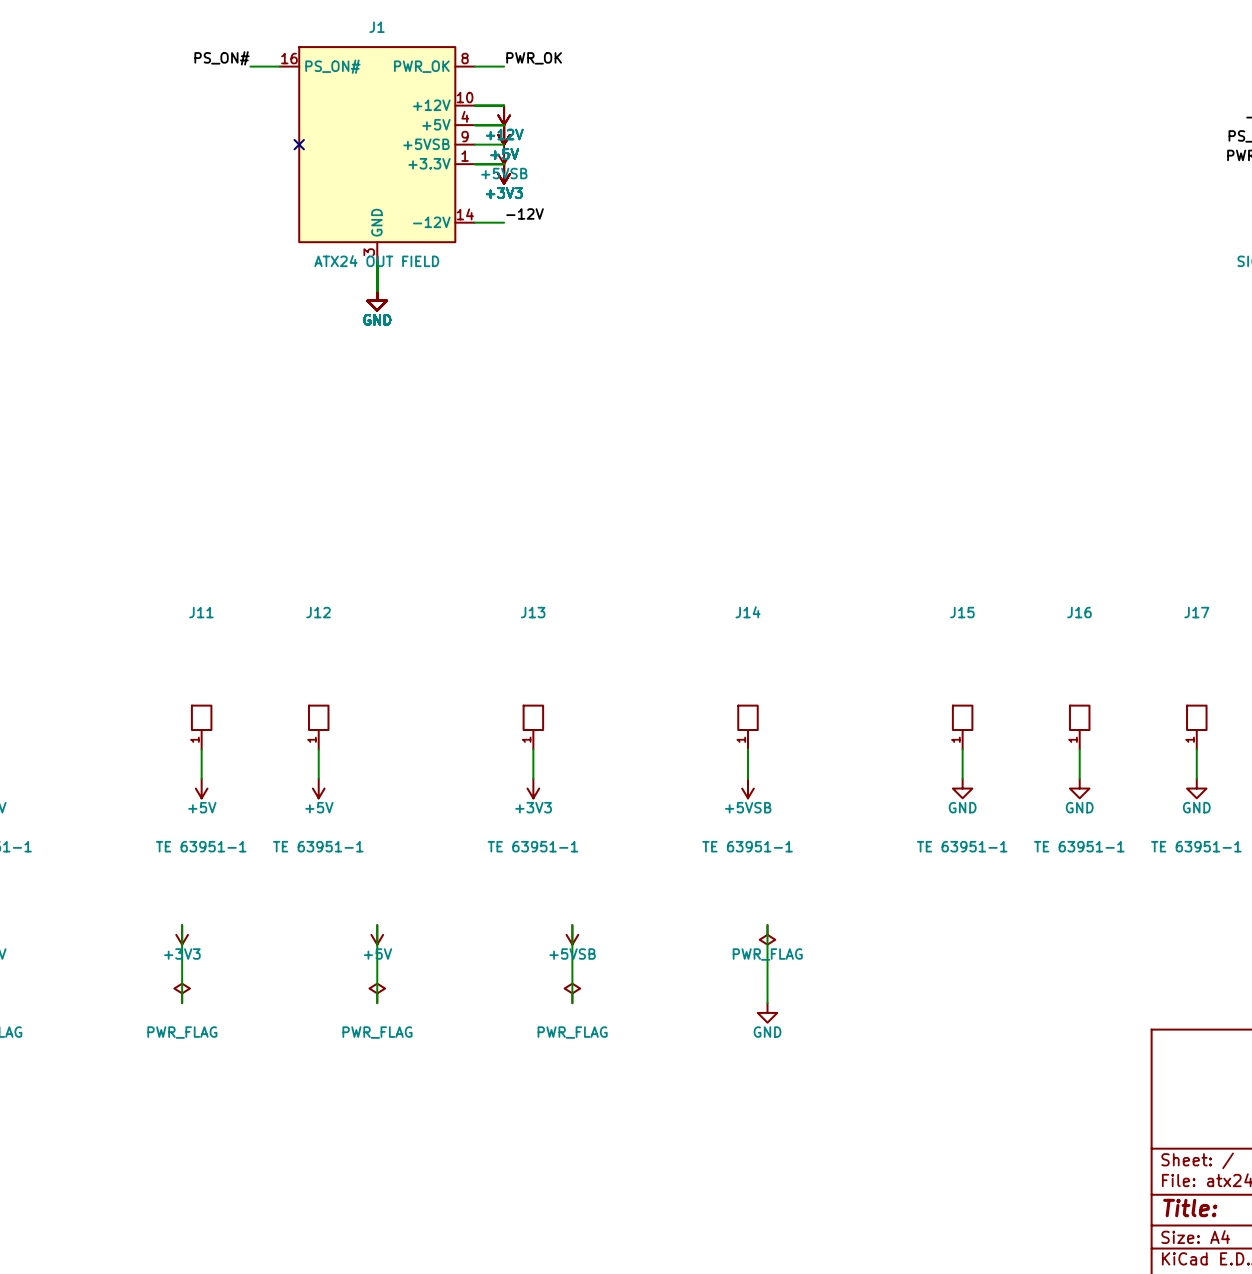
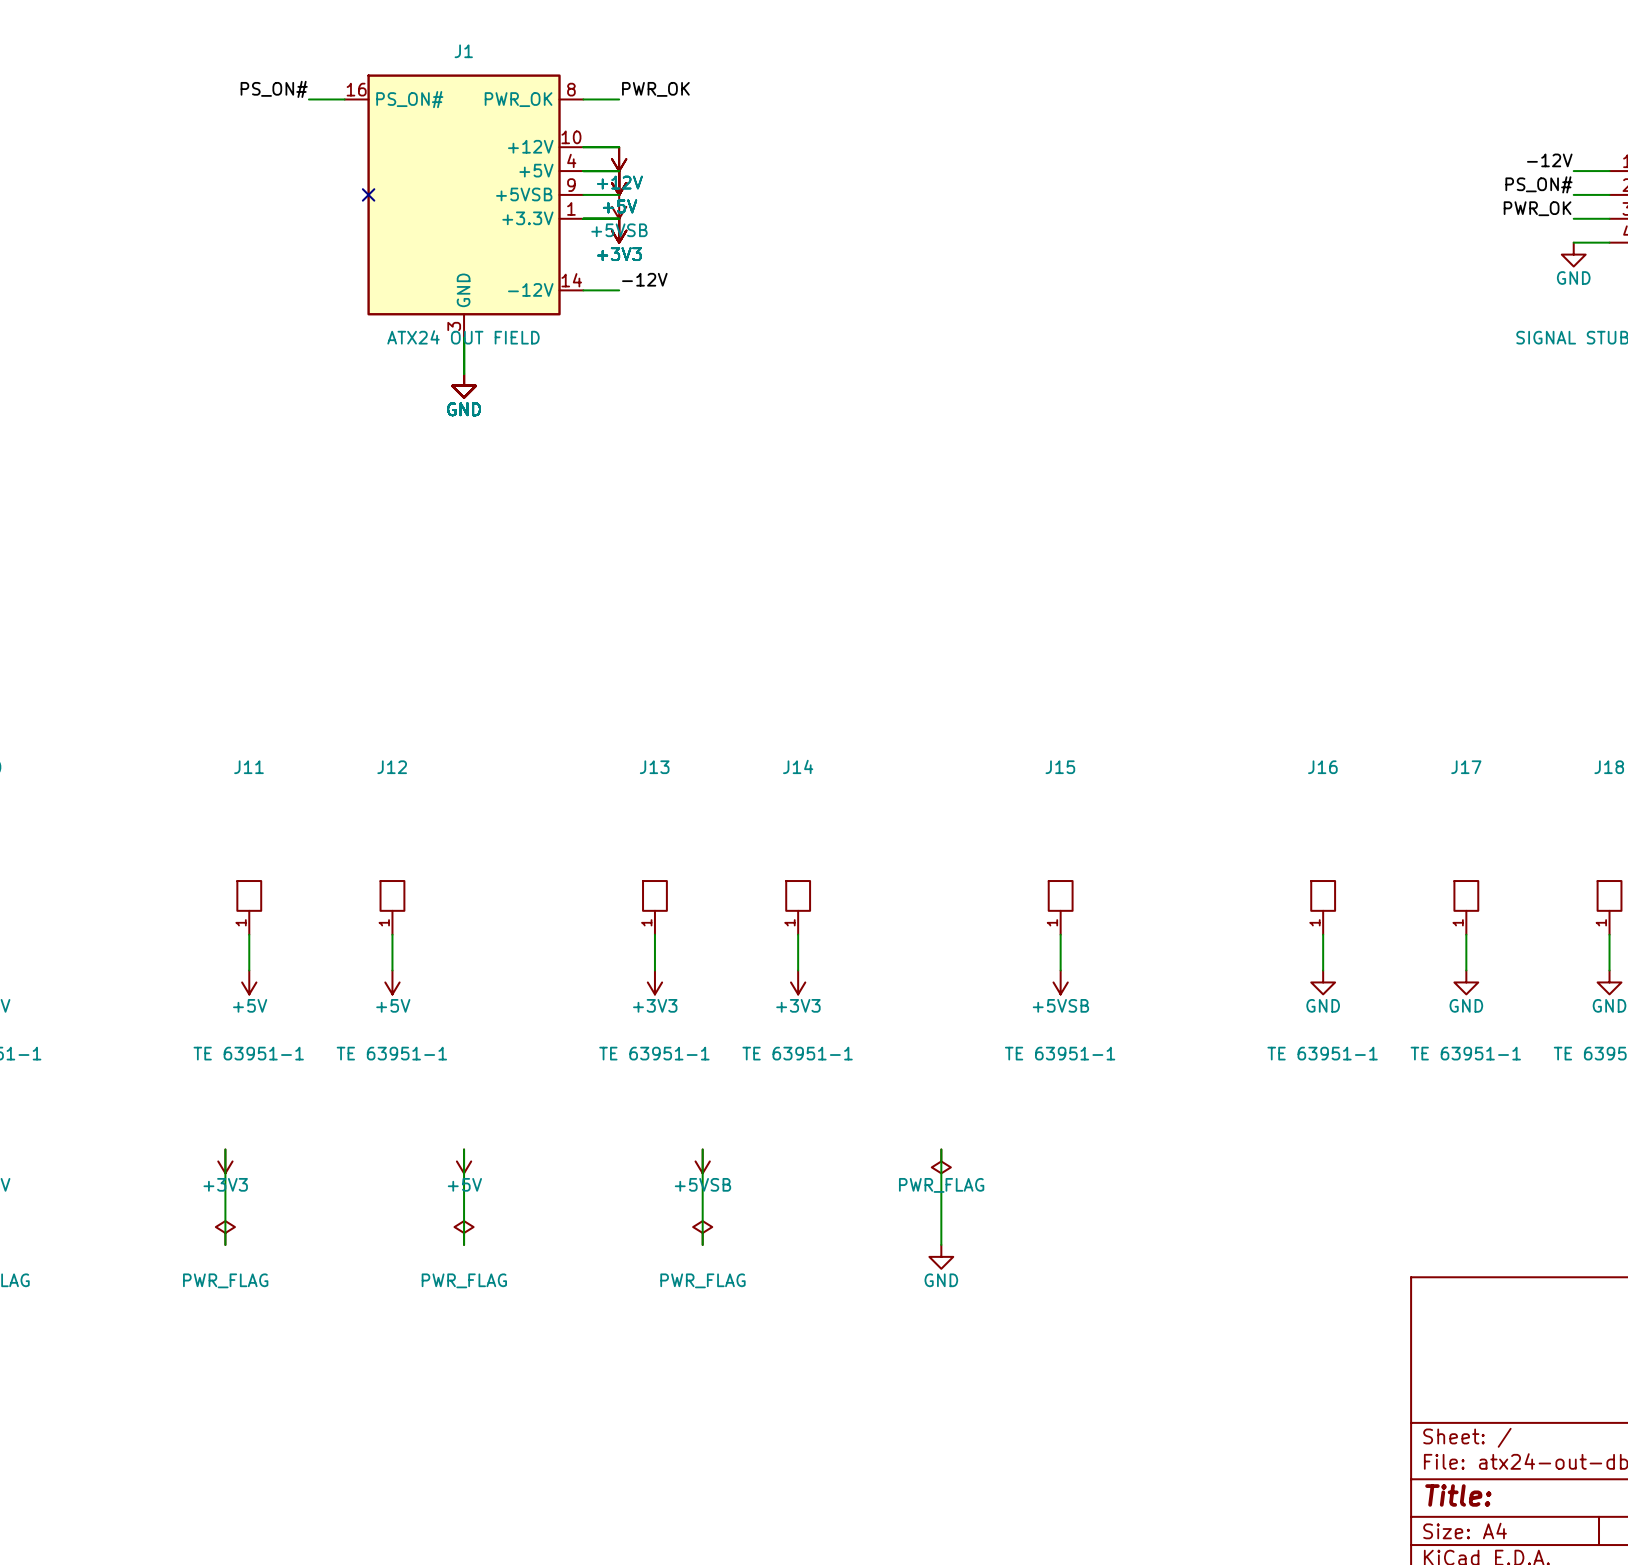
J14 position: (748, 727) -> (798, 907)
J15 position: (962, 727) -> (1060, 907)
wire: (748, 749) (748, 778) -> (798, 934) (798, 970)
wire: (962, 749) (962, 778) -> (1060, 934) (1060, 970)
power symbol: none -> +3V3 (798, 982)
power symbol position: +5VSB (748, 788) -> +5VSB (1060, 982)
power symbol: GND (962, 788) -> none

